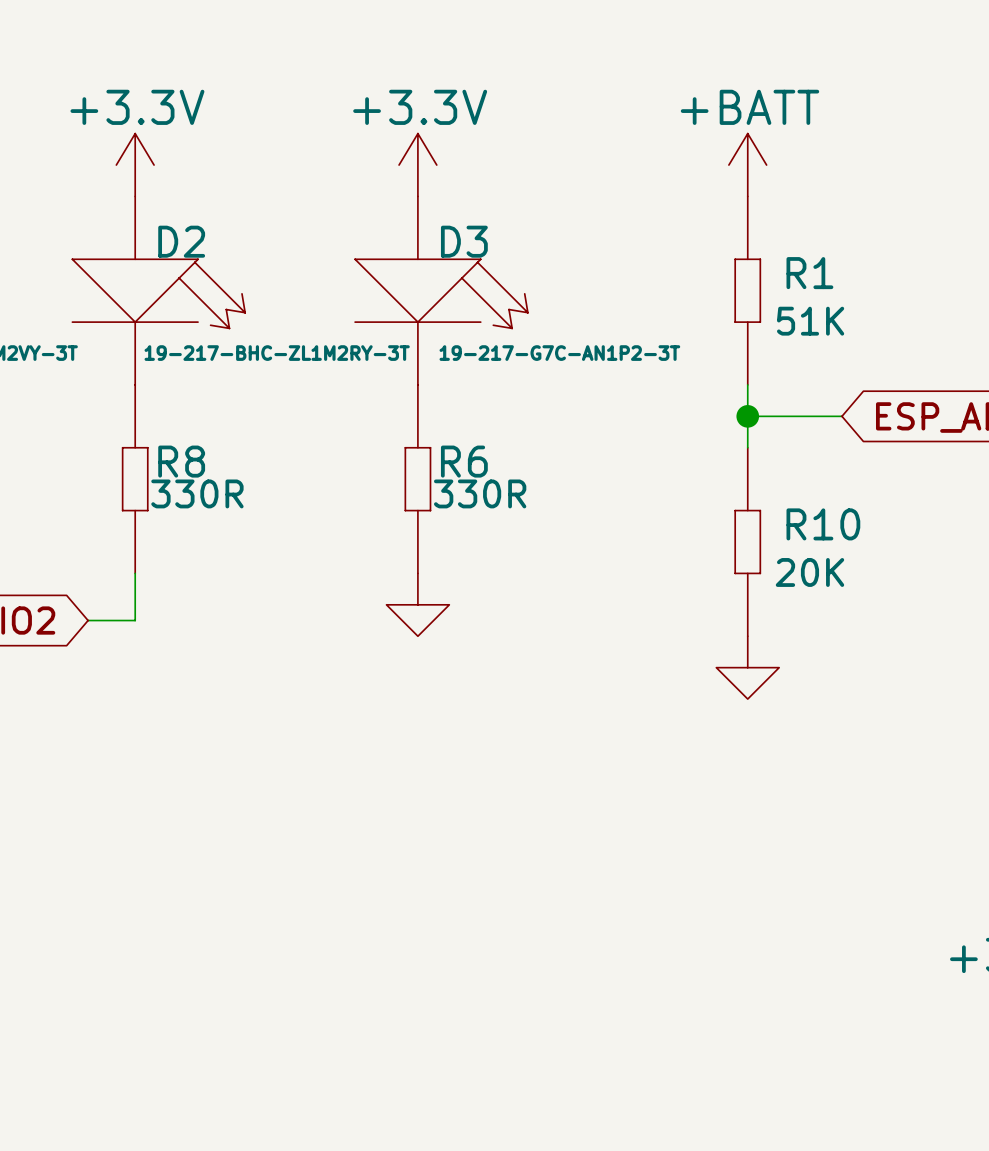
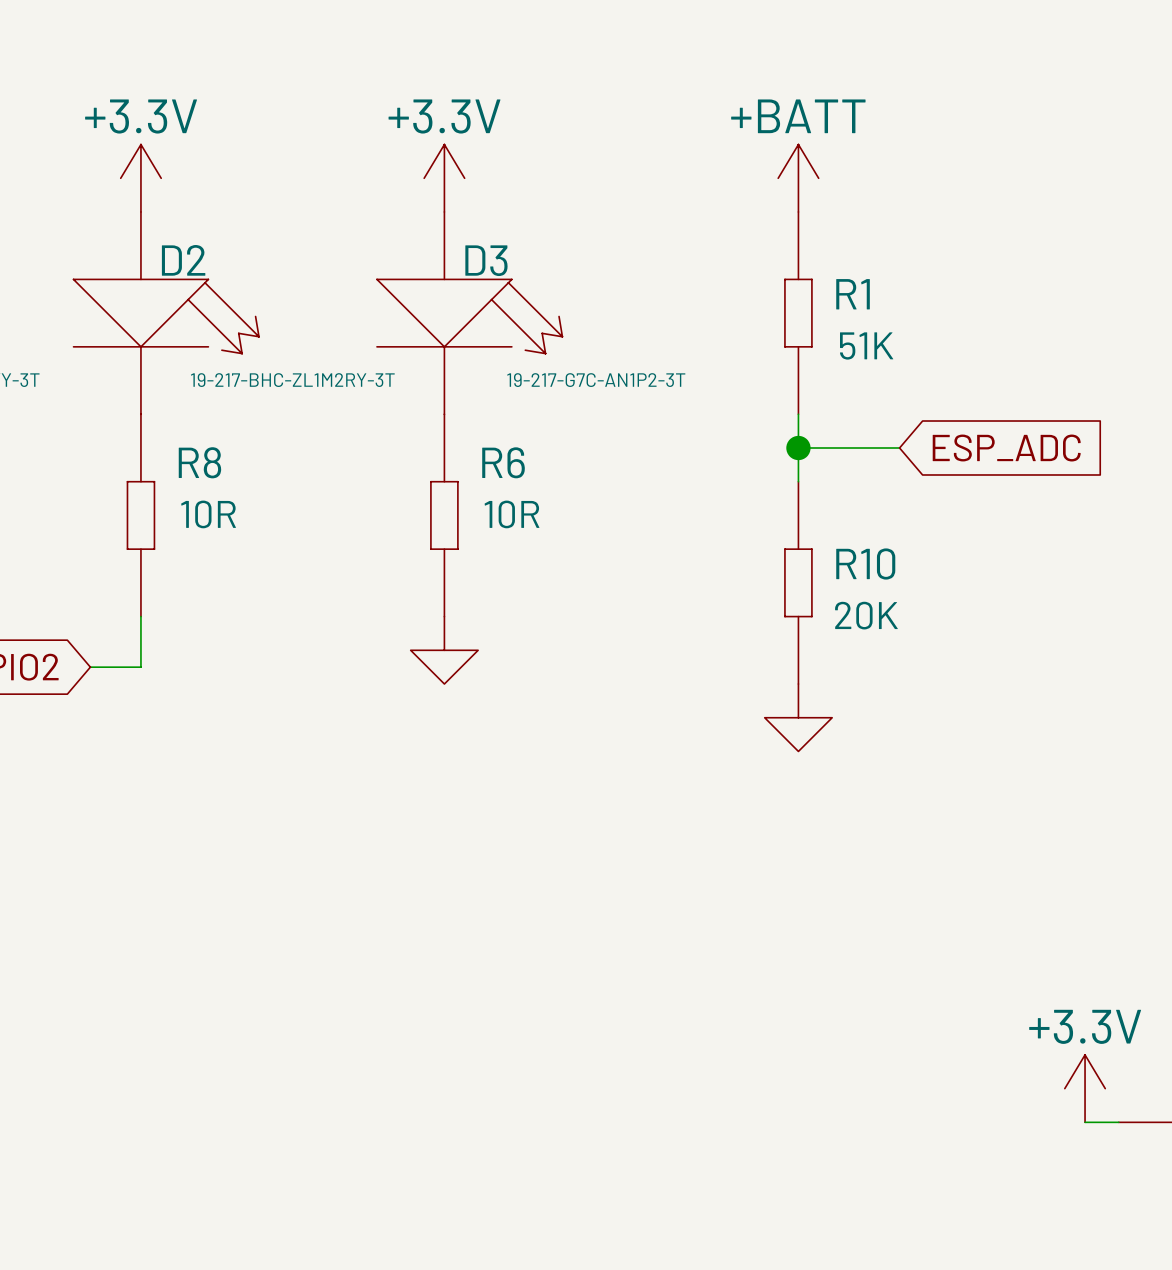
R8 name position: R8 (181, 461) -> R8 (199, 462)
R6 name position: R6 (464, 461) -> R6 (503, 462)
R8 text: 330R (197, 493) -> 10R (208, 514)
R6 text: 330R (480, 493) -> 10R (512, 514)

